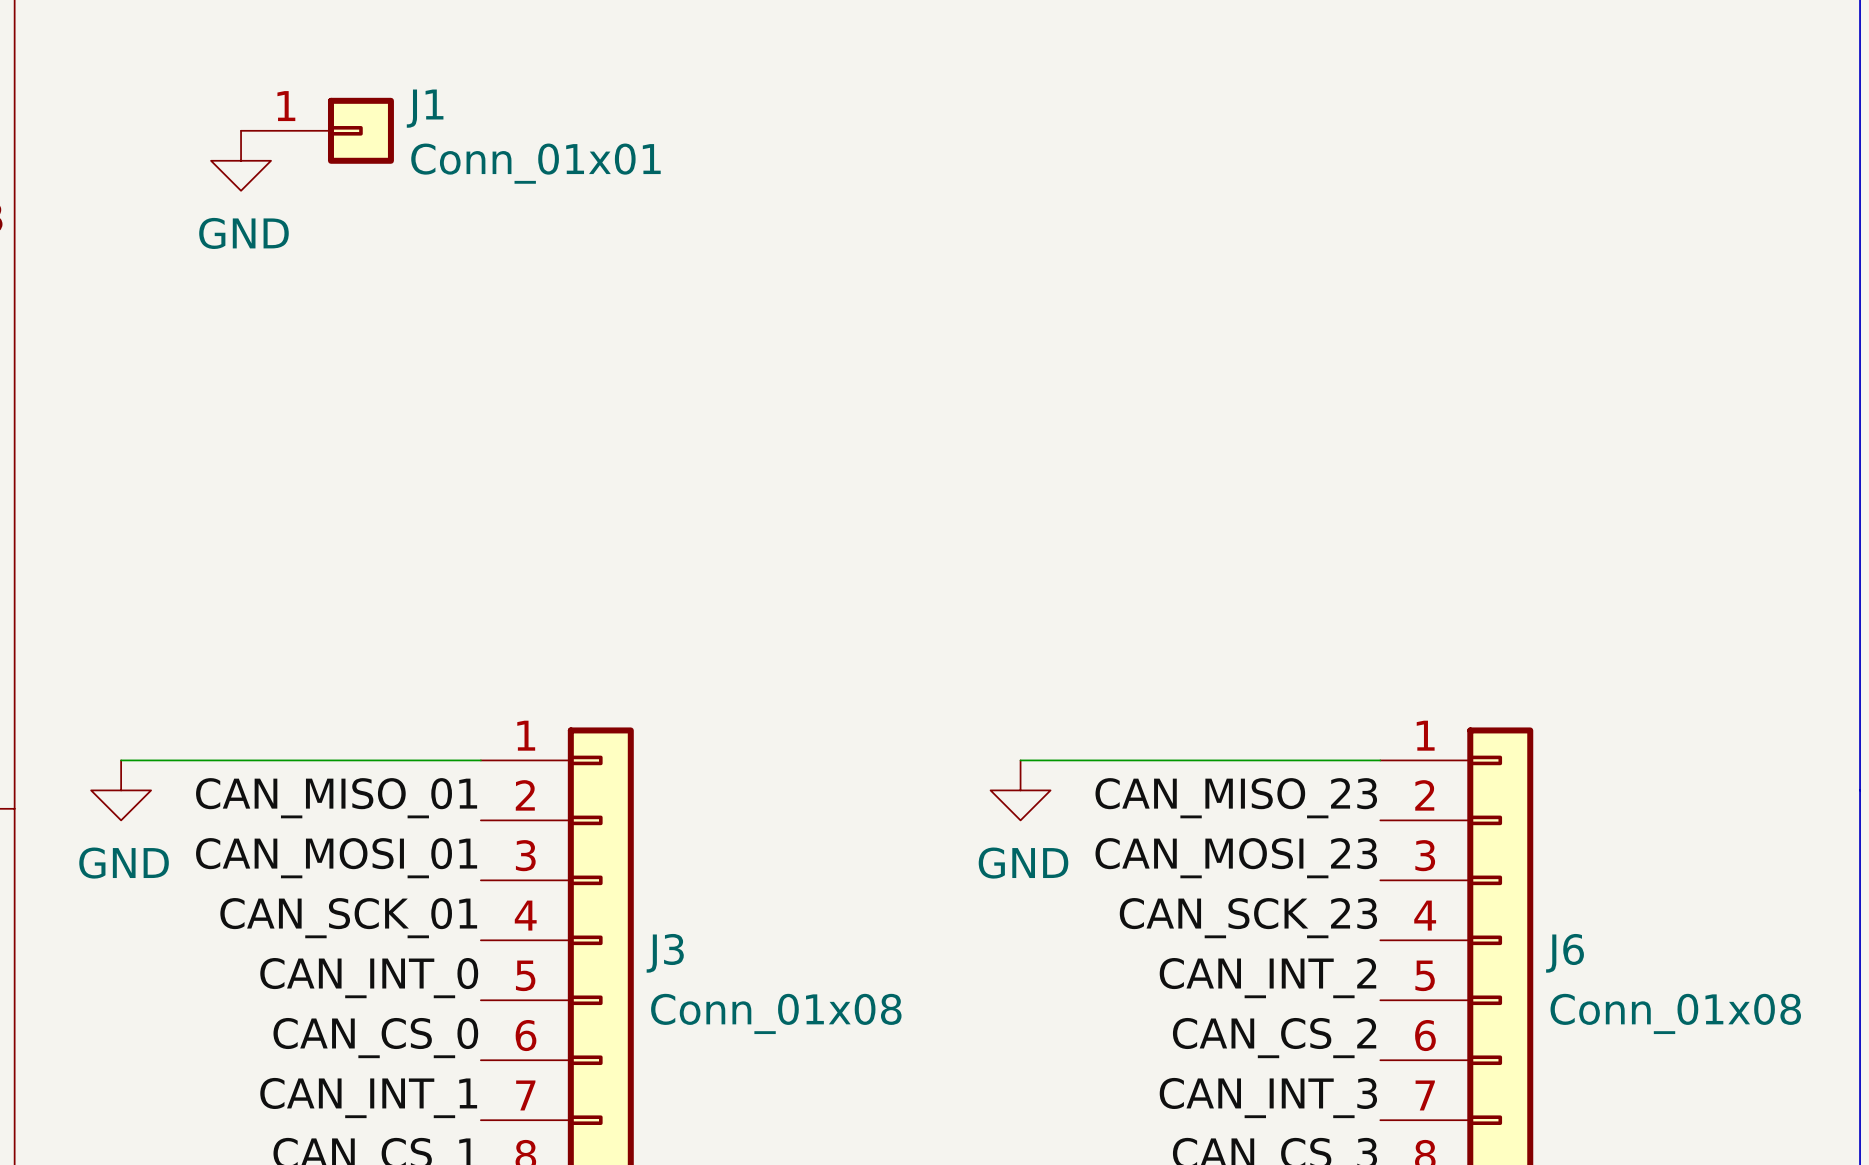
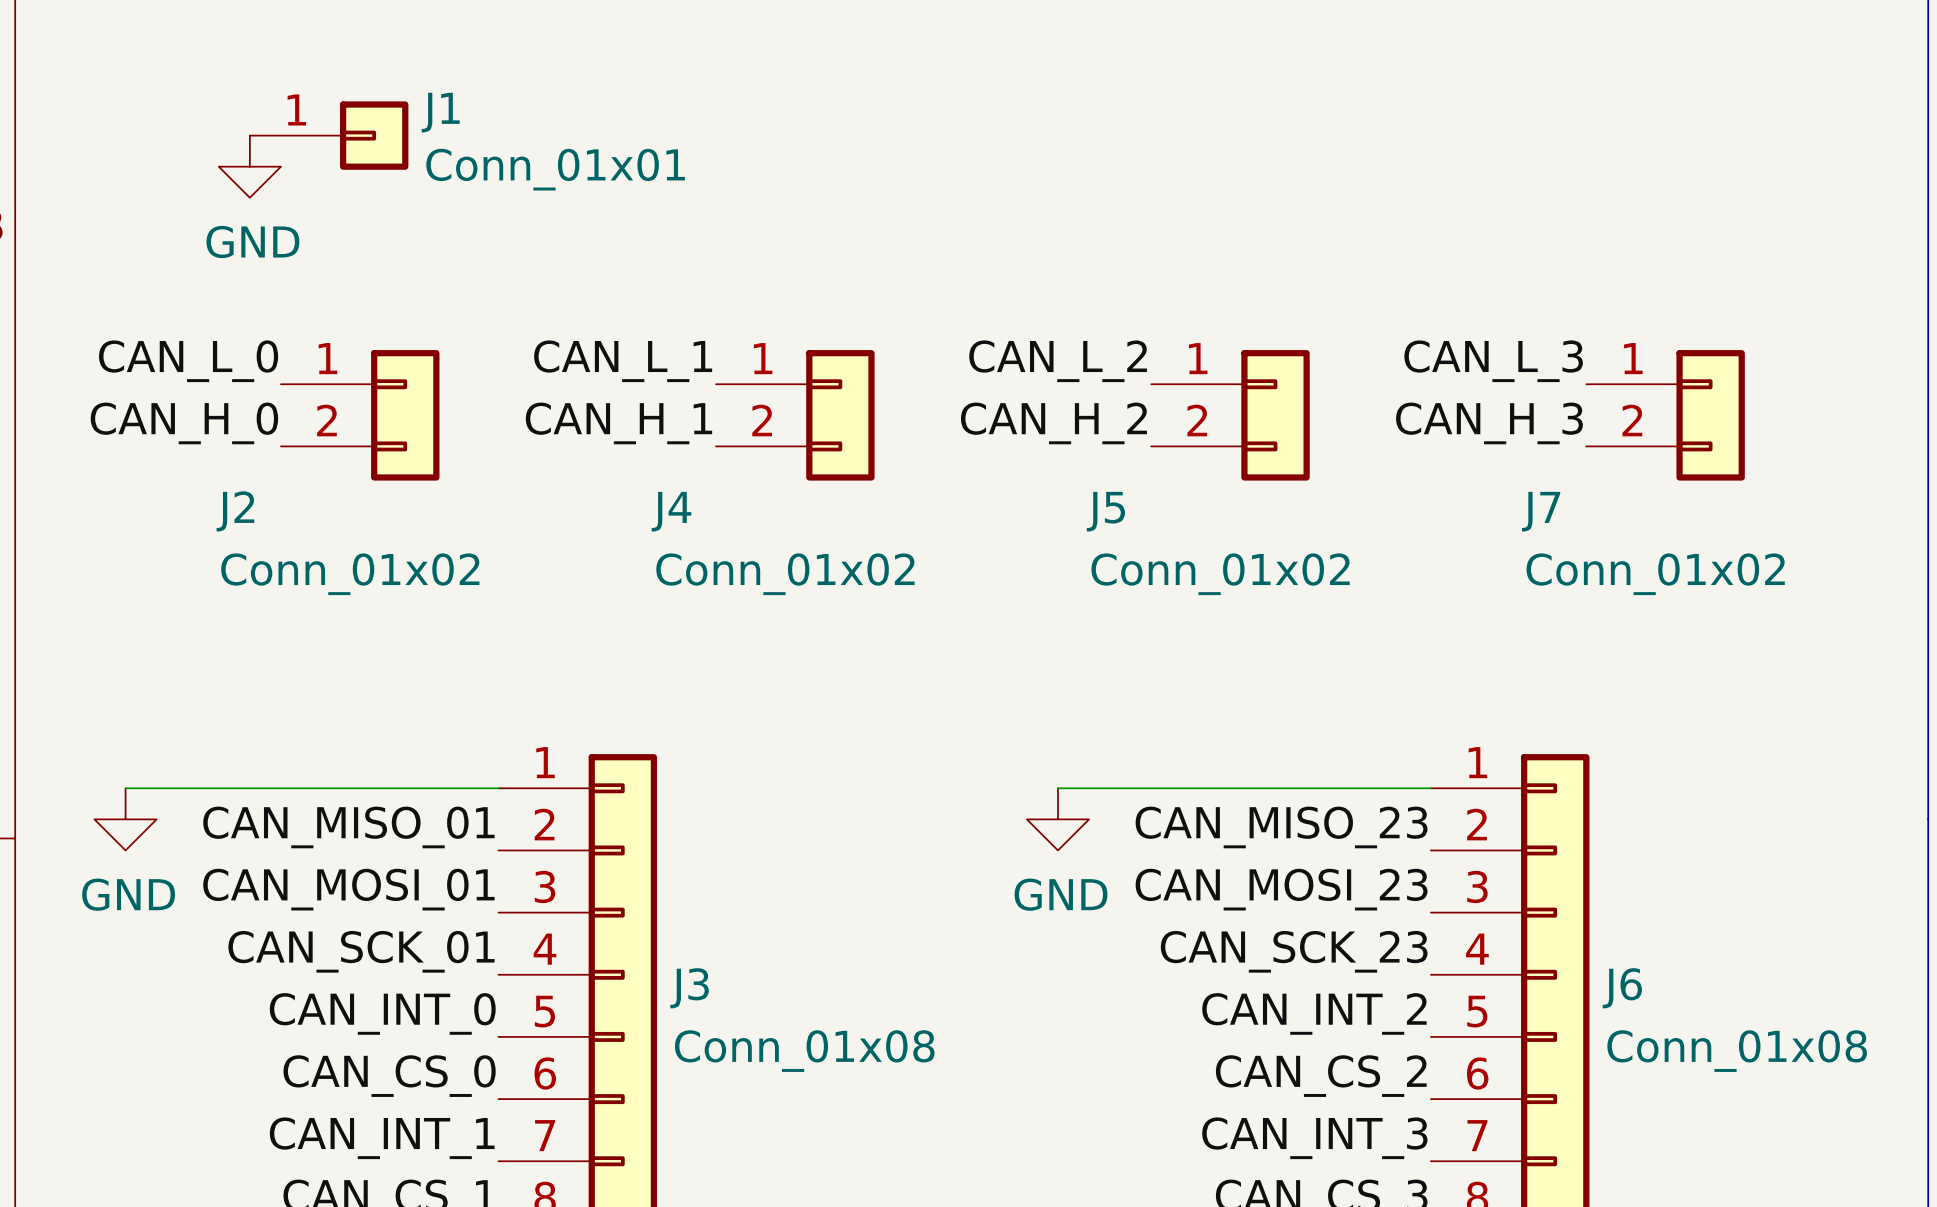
label: none -> CAN_L_0 (188, 361)
label: none -> CAN_L_1 (623, 361)
label: none -> CAN_L_2 (1058, 361)
label: none -> CAN_L_3 (1493, 361)
J2: none -> Conn_01x02 (360, 415)
J4: none -> Conn_01x02 (795, 415)
J5: none -> Conn_01x02 (1230, 415)
J7: none -> Conn_01x02 (1665, 415)
label: none -> CAN_H_0 (184, 423)
label: none -> CAN_H_1 (618, 423)
label: none -> CAN_H_2 (1053, 423)
label: none -> CAN_H_3 (1489, 423)

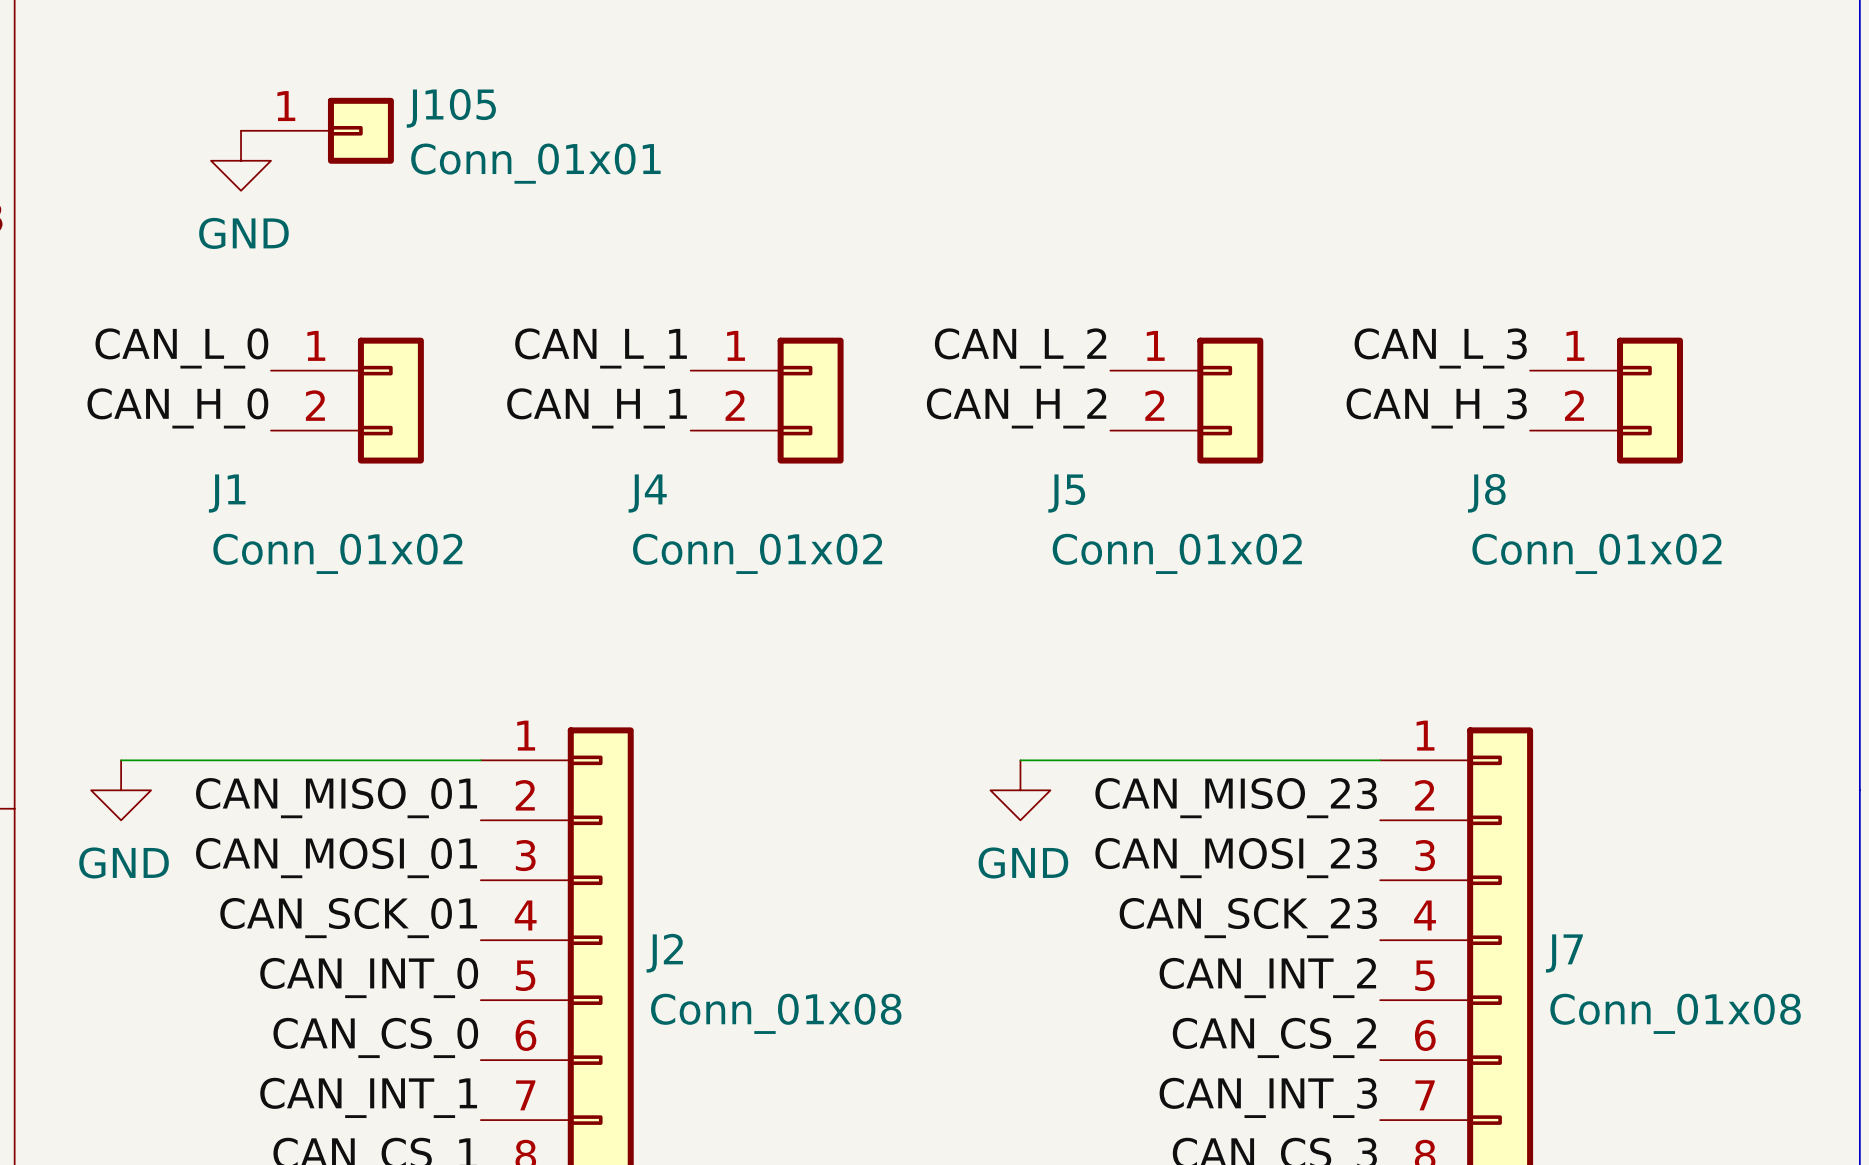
J1 name: J1 (440, 112) -> J105 (451, 108)
J2 name: J2 (235, 511) -> J1 (227, 493)
J7 name: J7 (1541, 511) -> J8 (1486, 493)
J3 name: J3 (689, 988) -> J2 (664, 953)
J6 name: J6 (1622, 988) -> J7 (1564, 953)

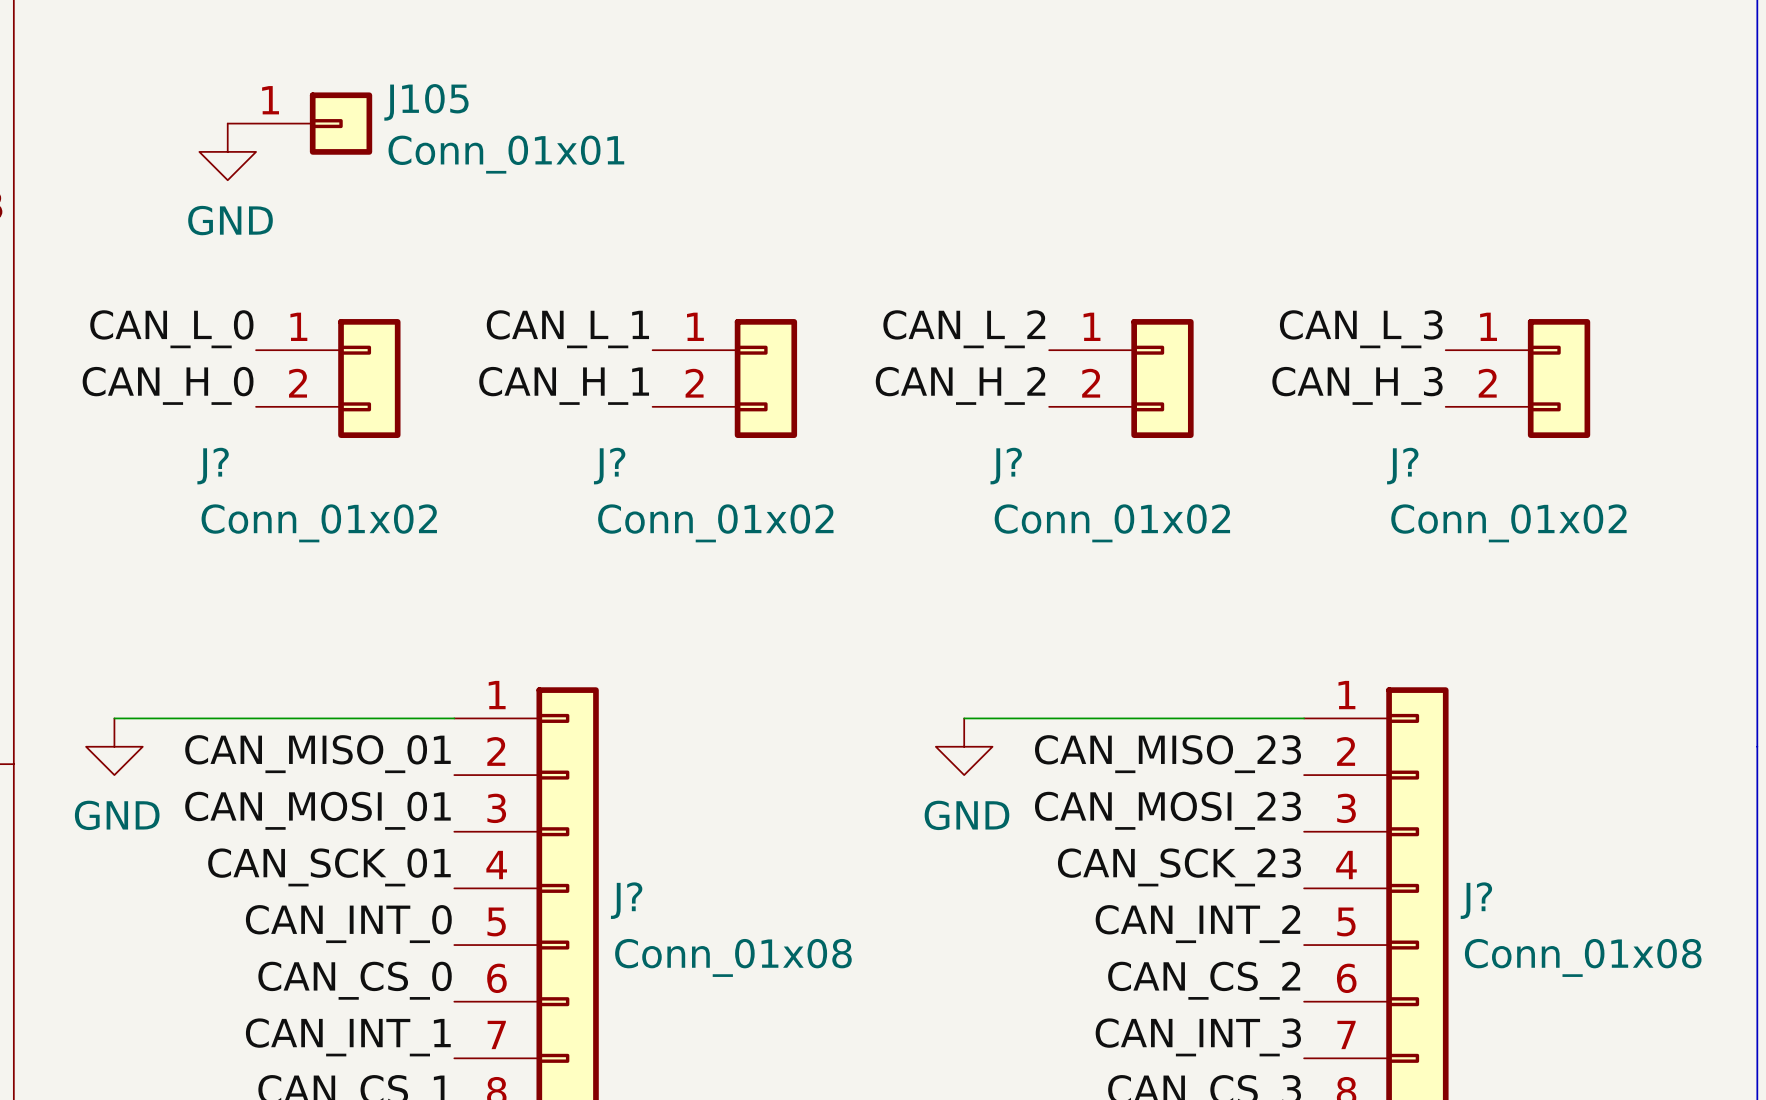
J1 name: J1 (227, 493) -> J? (213, 466)
J4 name: J4 (647, 493) -> J? (609, 466)
J5 name: J5 (1066, 493) -> J? (1006, 466)
J8 name: J8 (1486, 493) -> J? (1402, 466)
J2 name: J2 (664, 953) -> J? (626, 900)
J7 name: J7 (1564, 953) -> J? (1476, 900)

